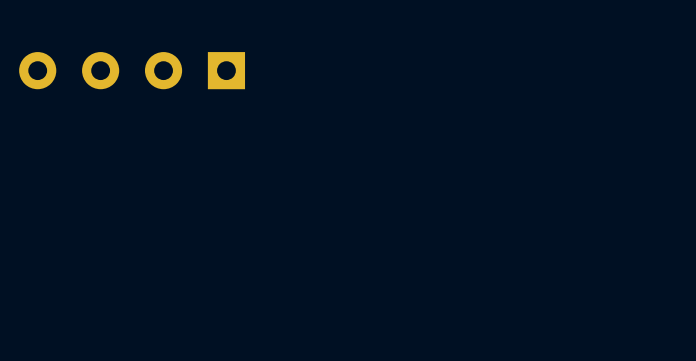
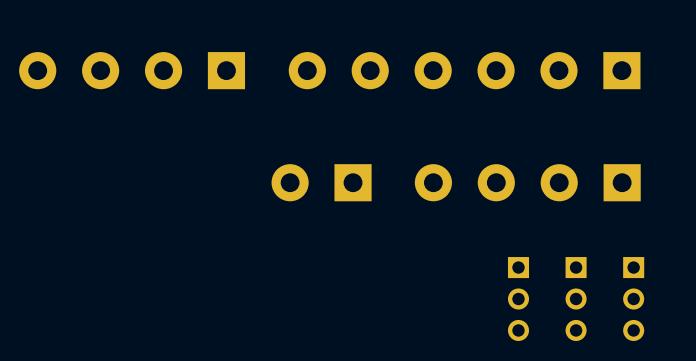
part: none -> (464, 70)
part: none -> (321, 182)
part: none -> (527, 182)
part: none -> (518, 299)
part: none -> (576, 299)
part: none -> (633, 299)

